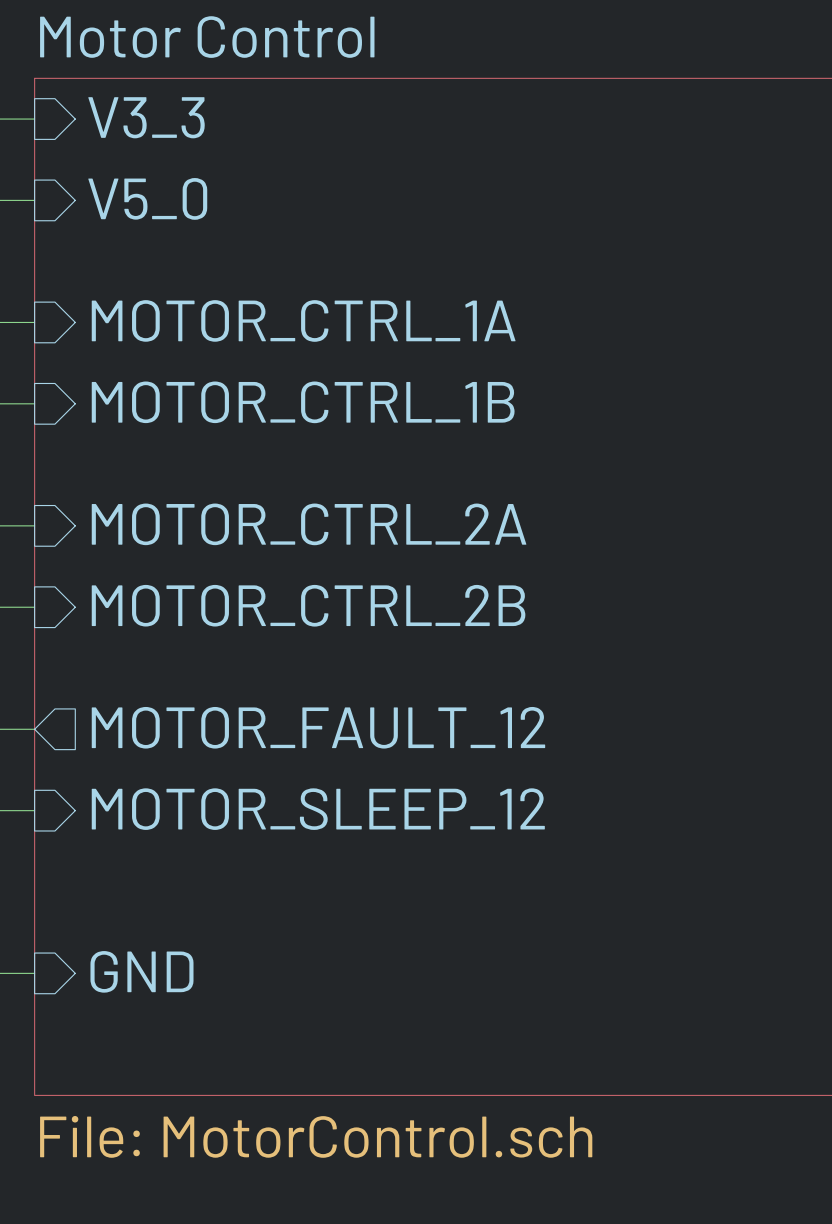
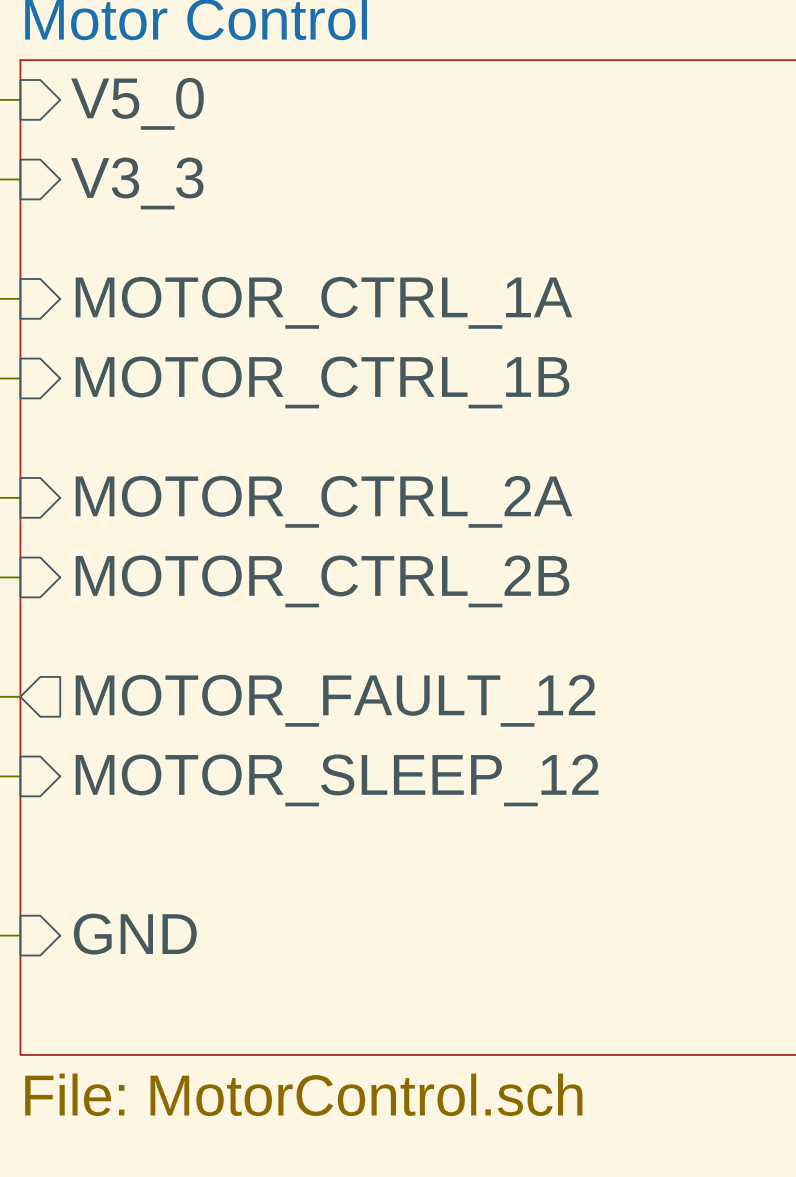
sheet pin: V3_3 (146, 117) -> V5_0 (137, 103)
sheet pin: V5_0 (147, 198) -> V3_3 (137, 183)

